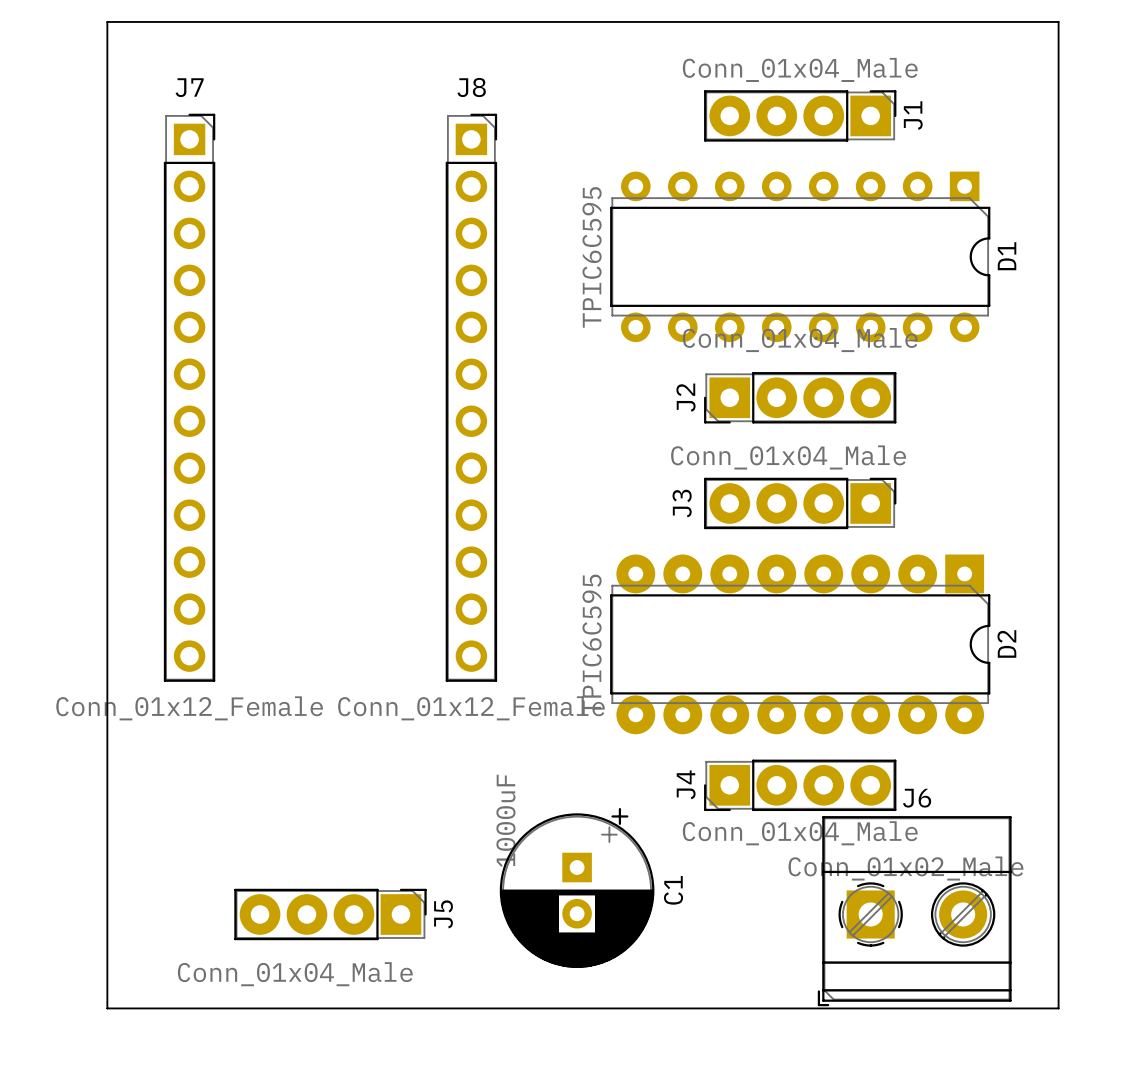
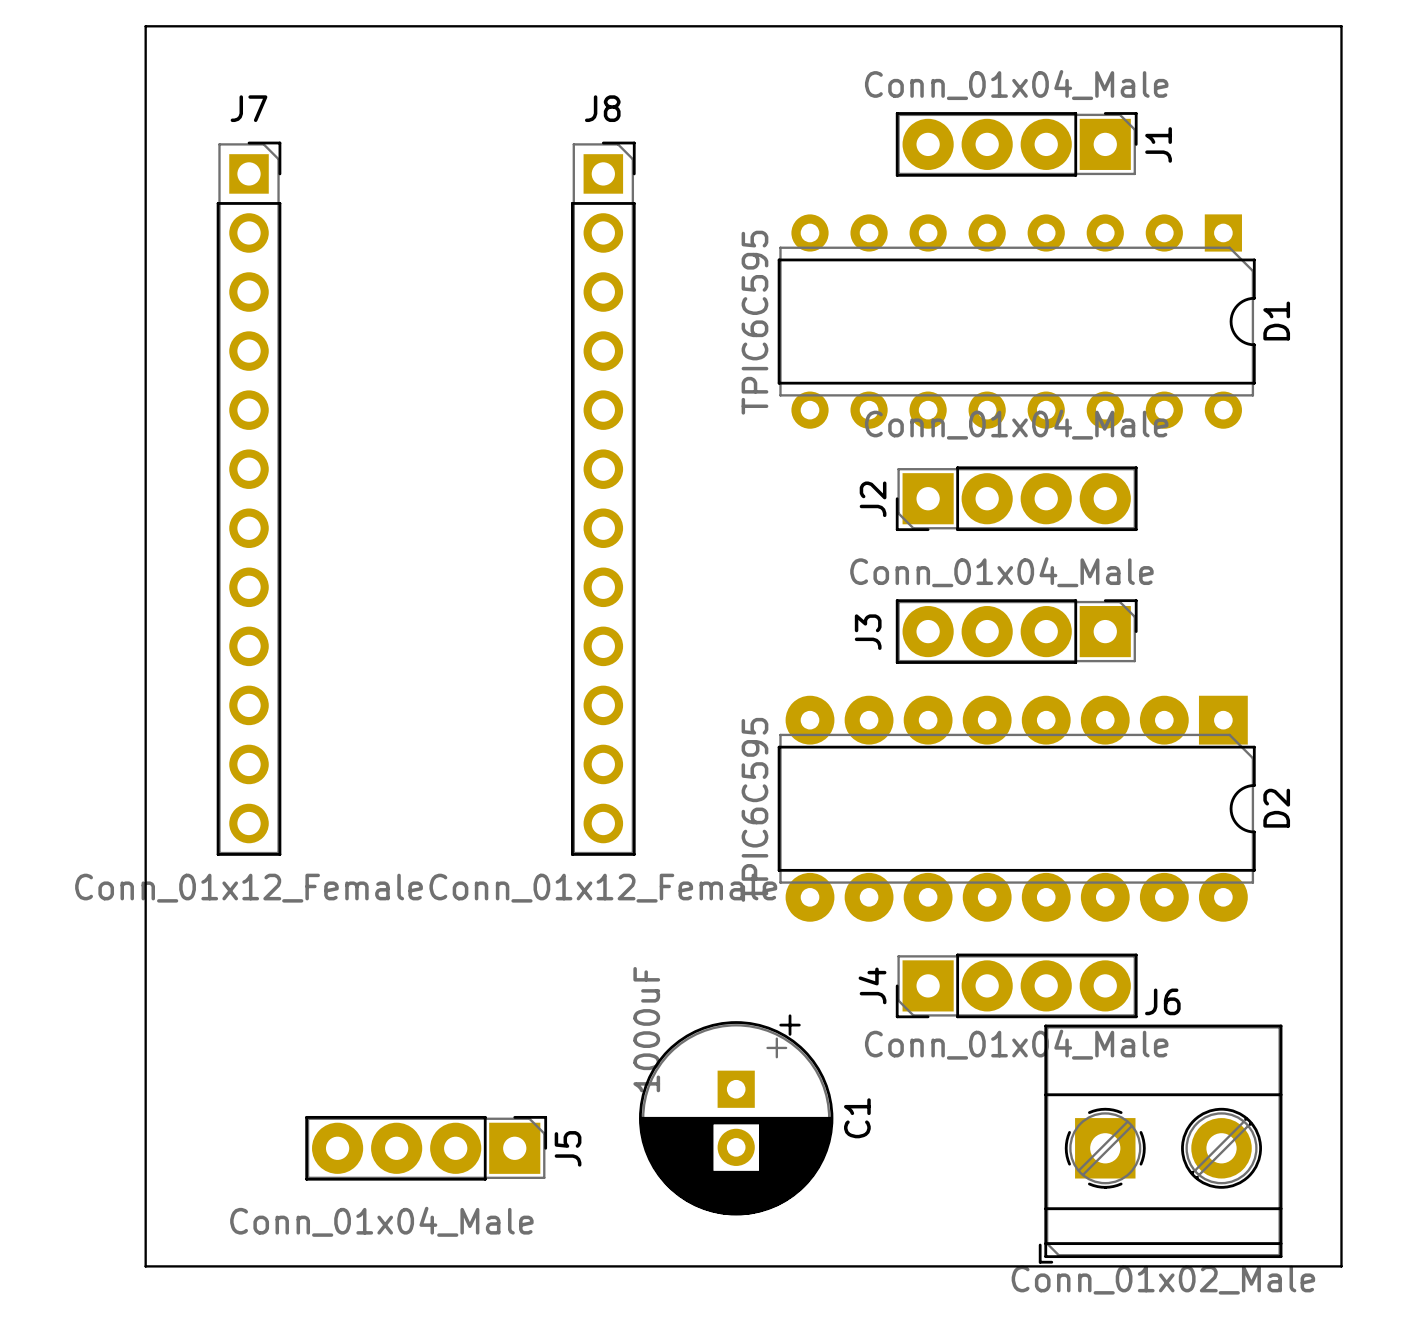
J6 value position: Conn_01x02_Male (905, 868) -> Conn_01x02_Male (1163, 1280)

